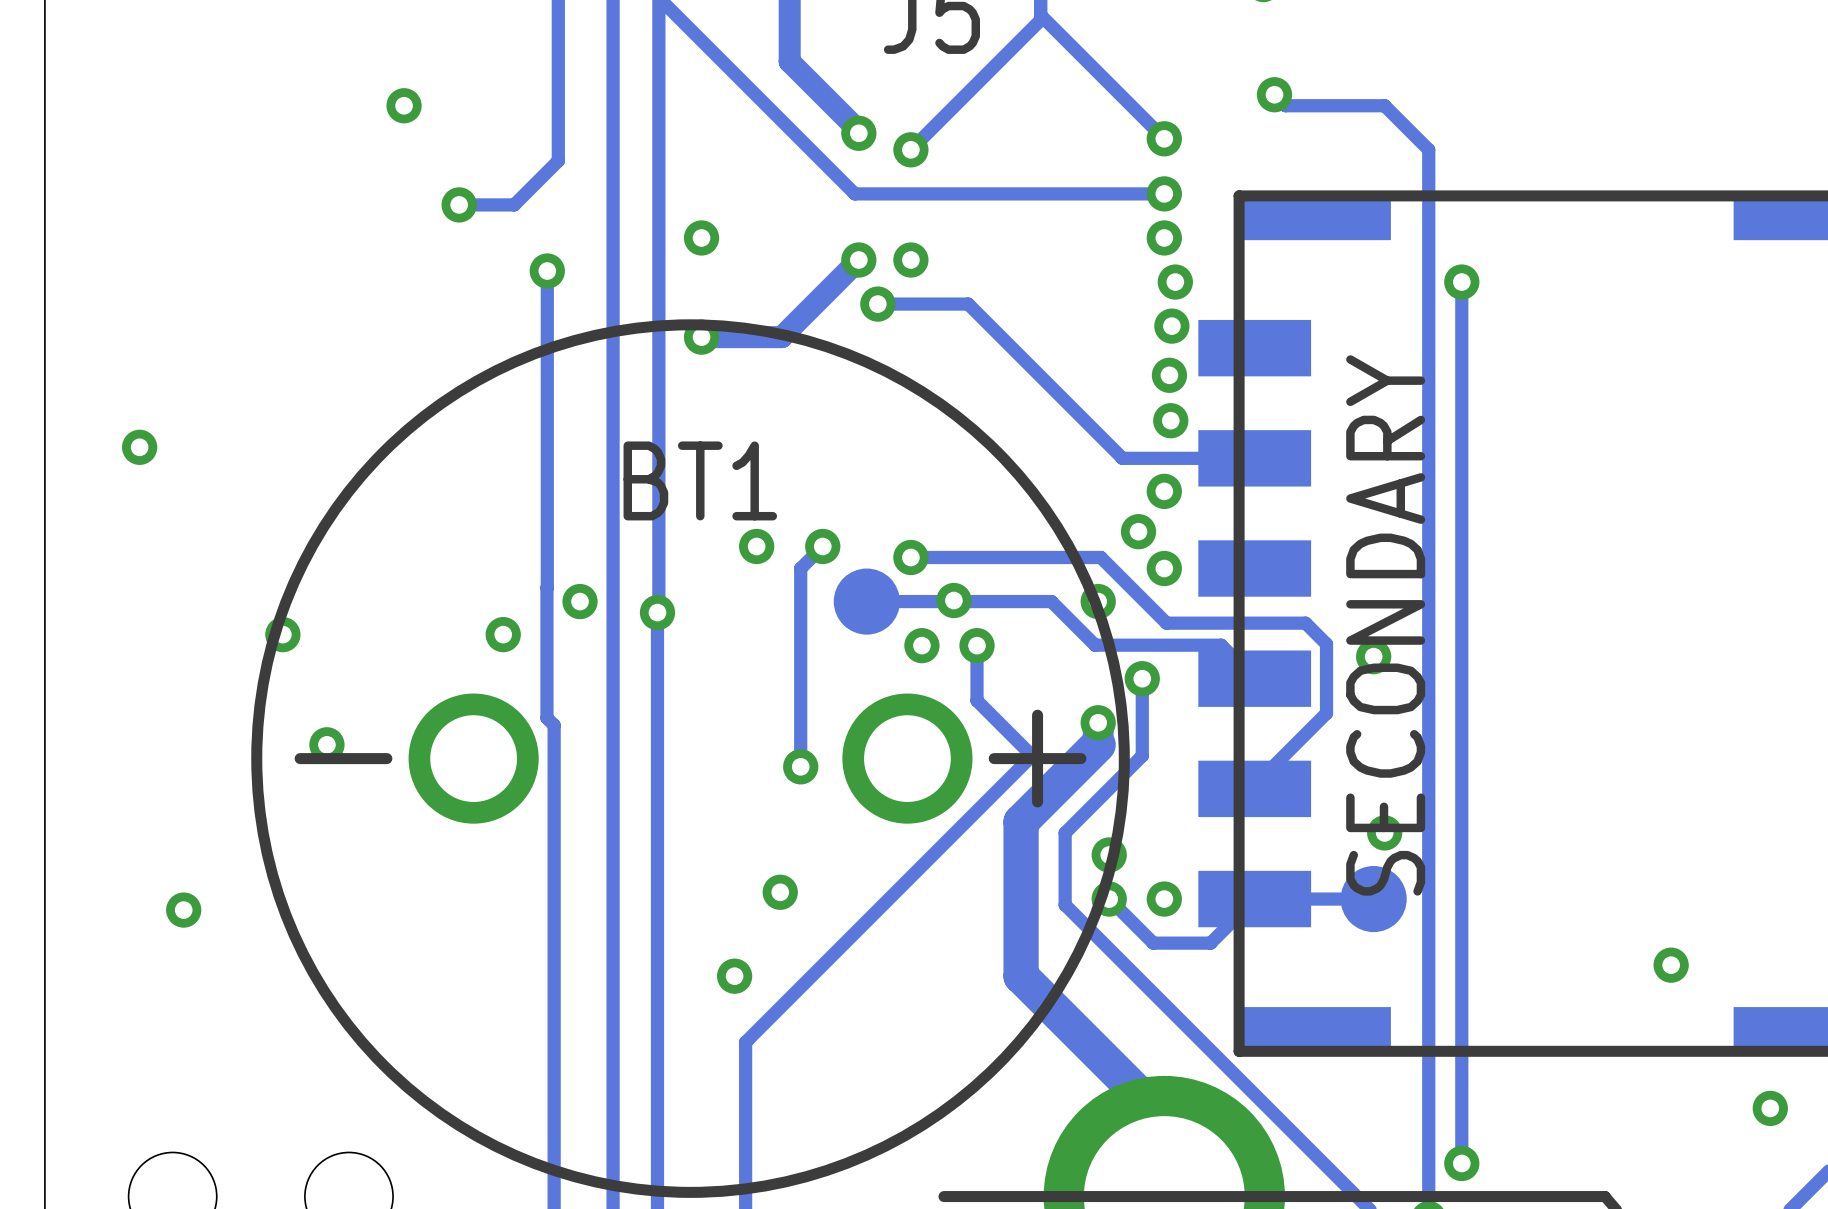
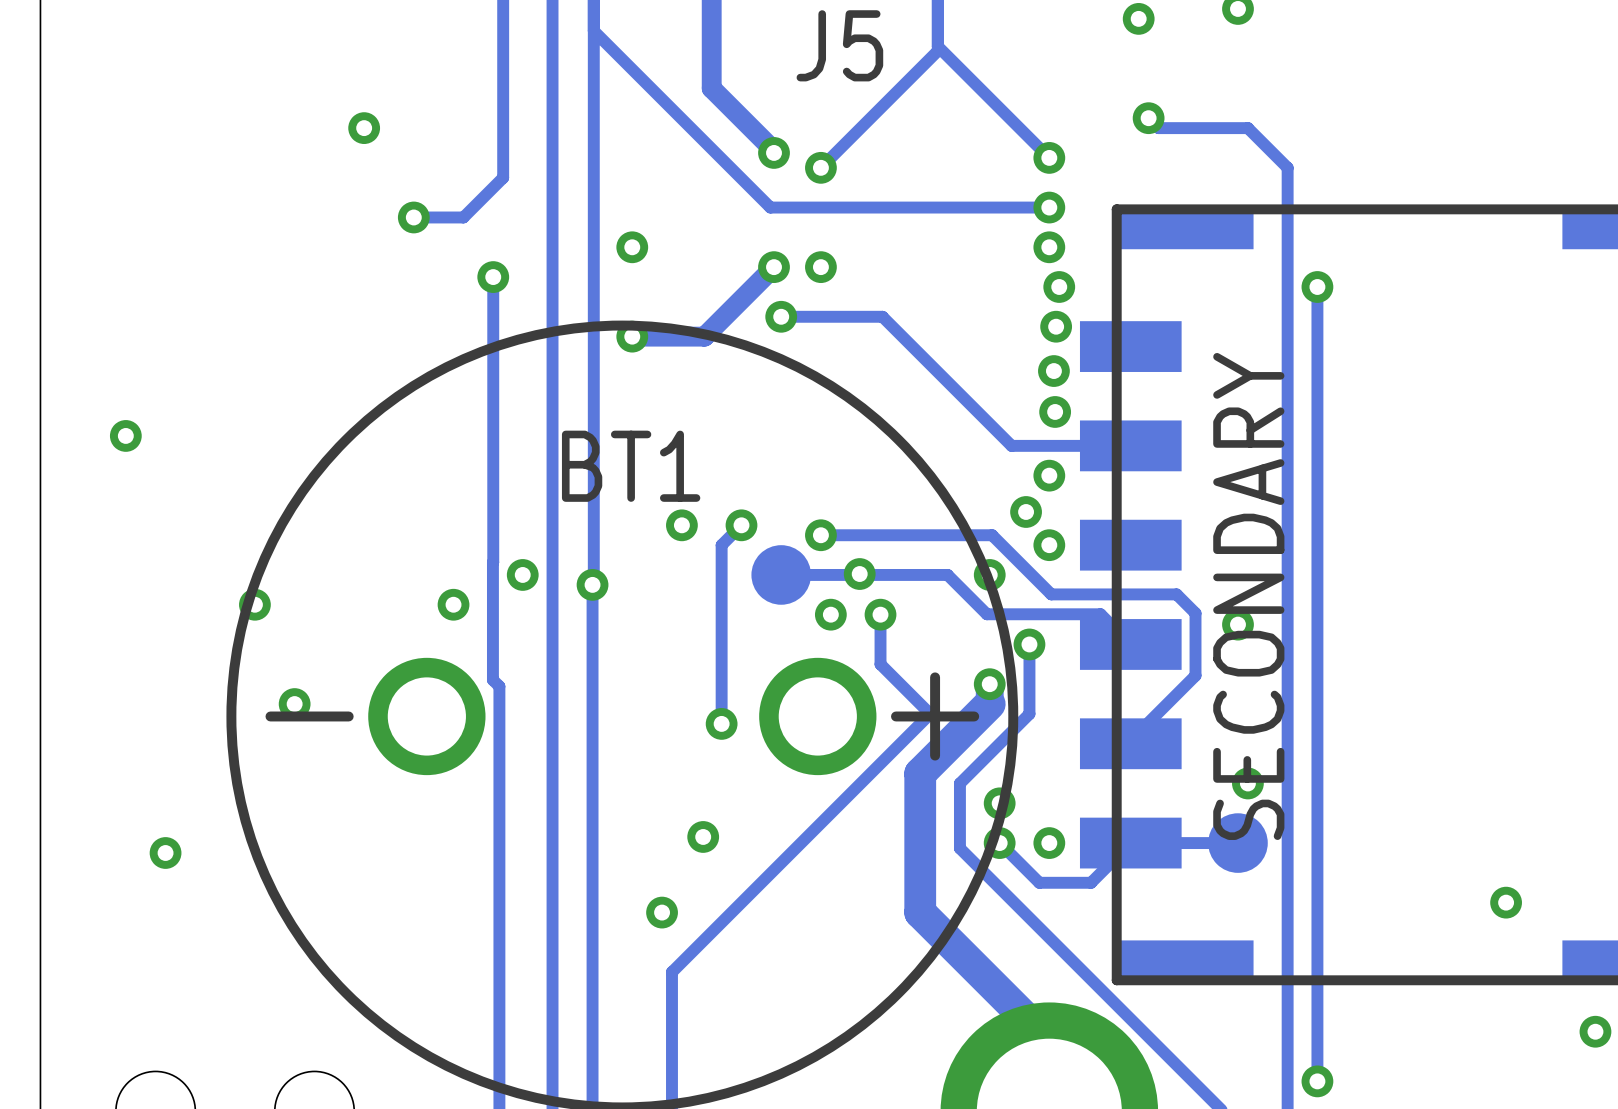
track: (877, 304) (968, 304) (979, 315) -> (781, 316) (882, 316)
via position: (877, 304) -> (781, 316)

